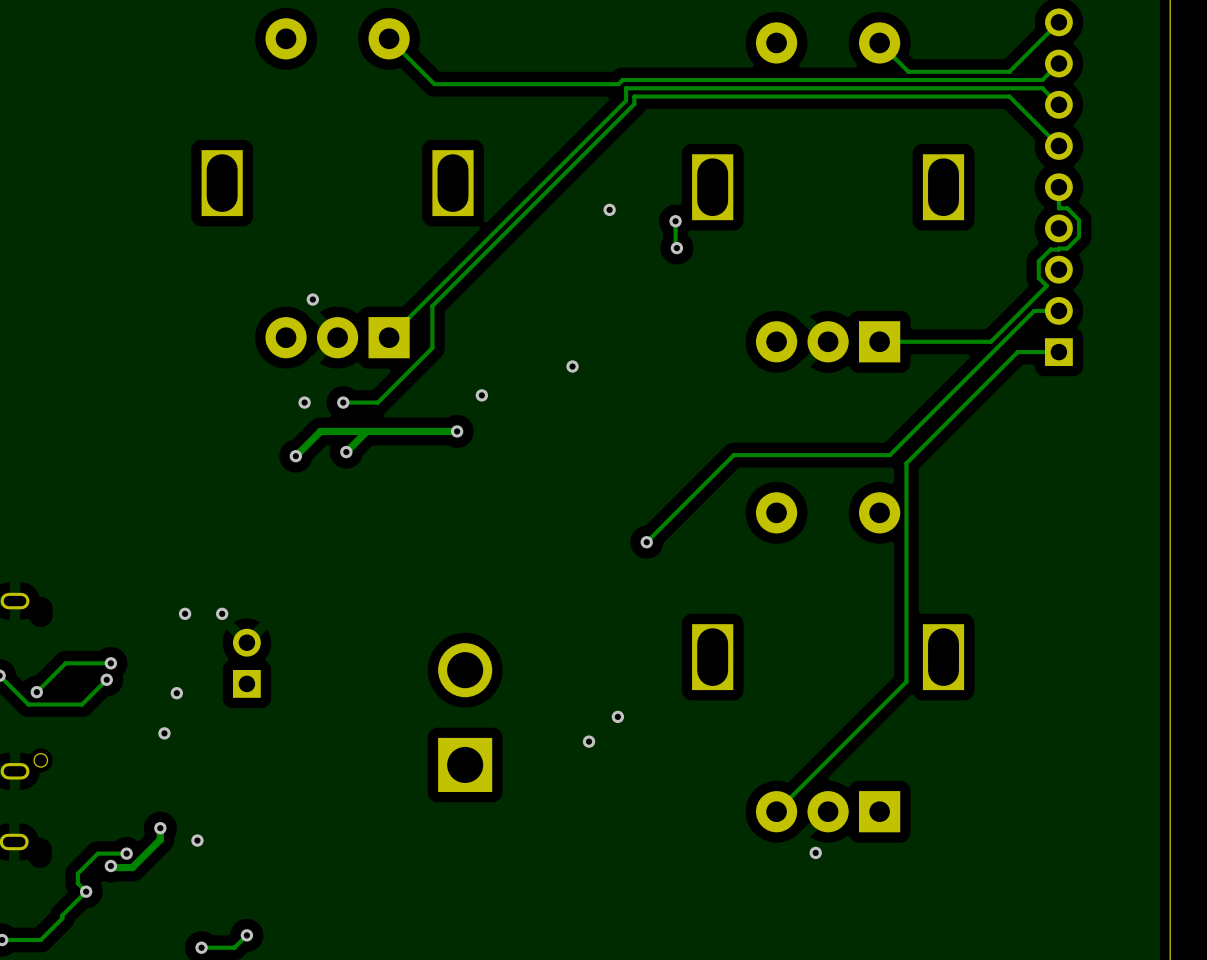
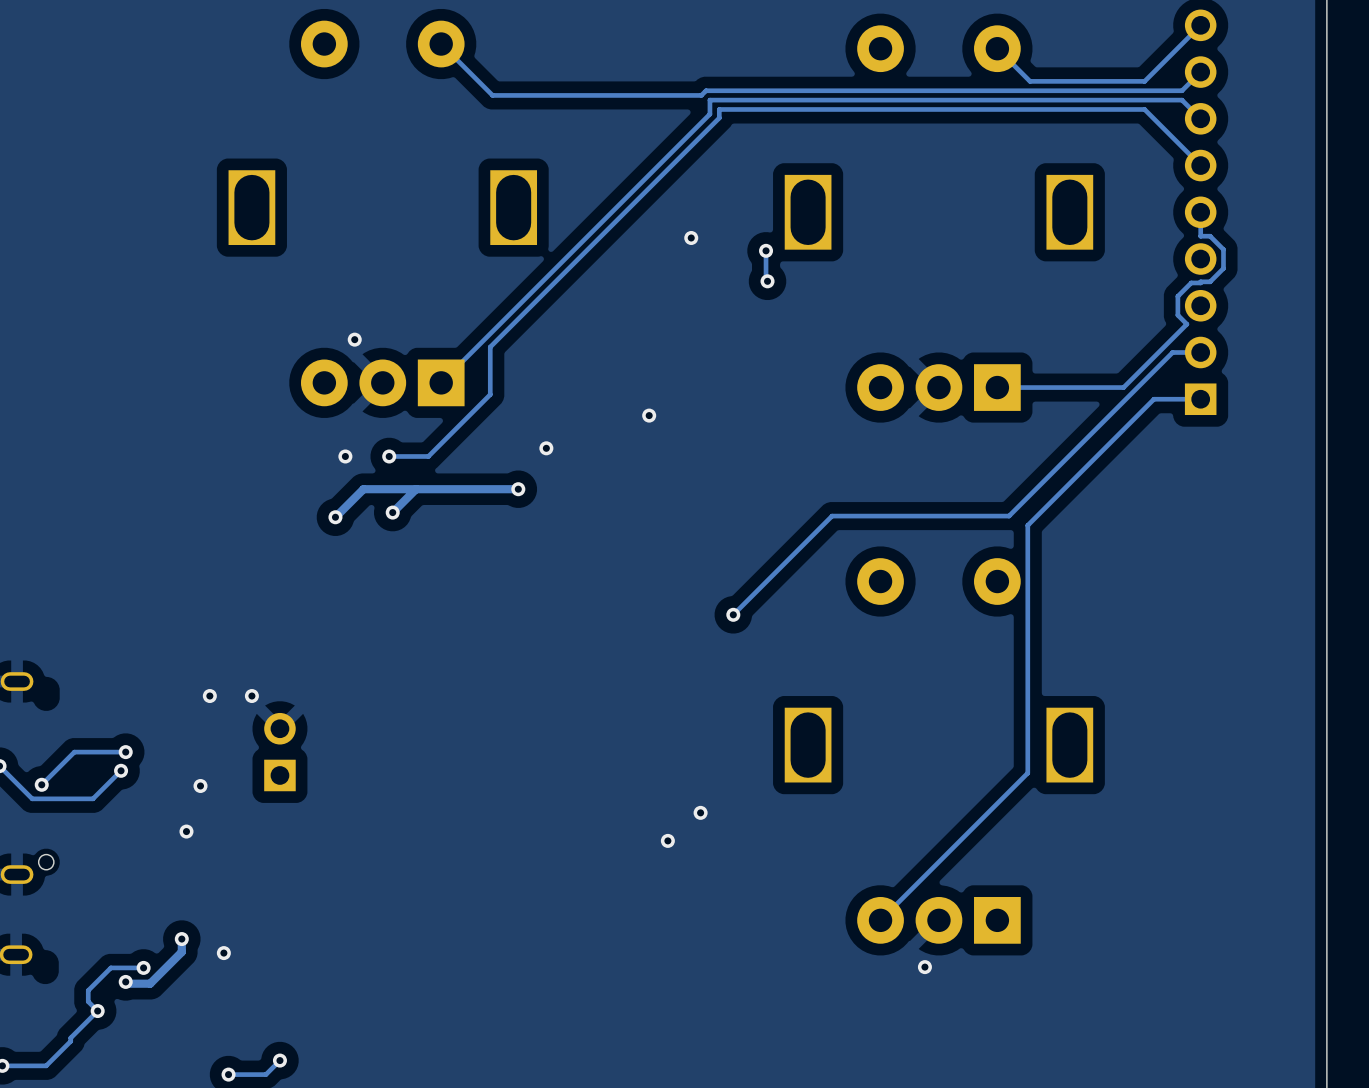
part: (465, 717) -> none

